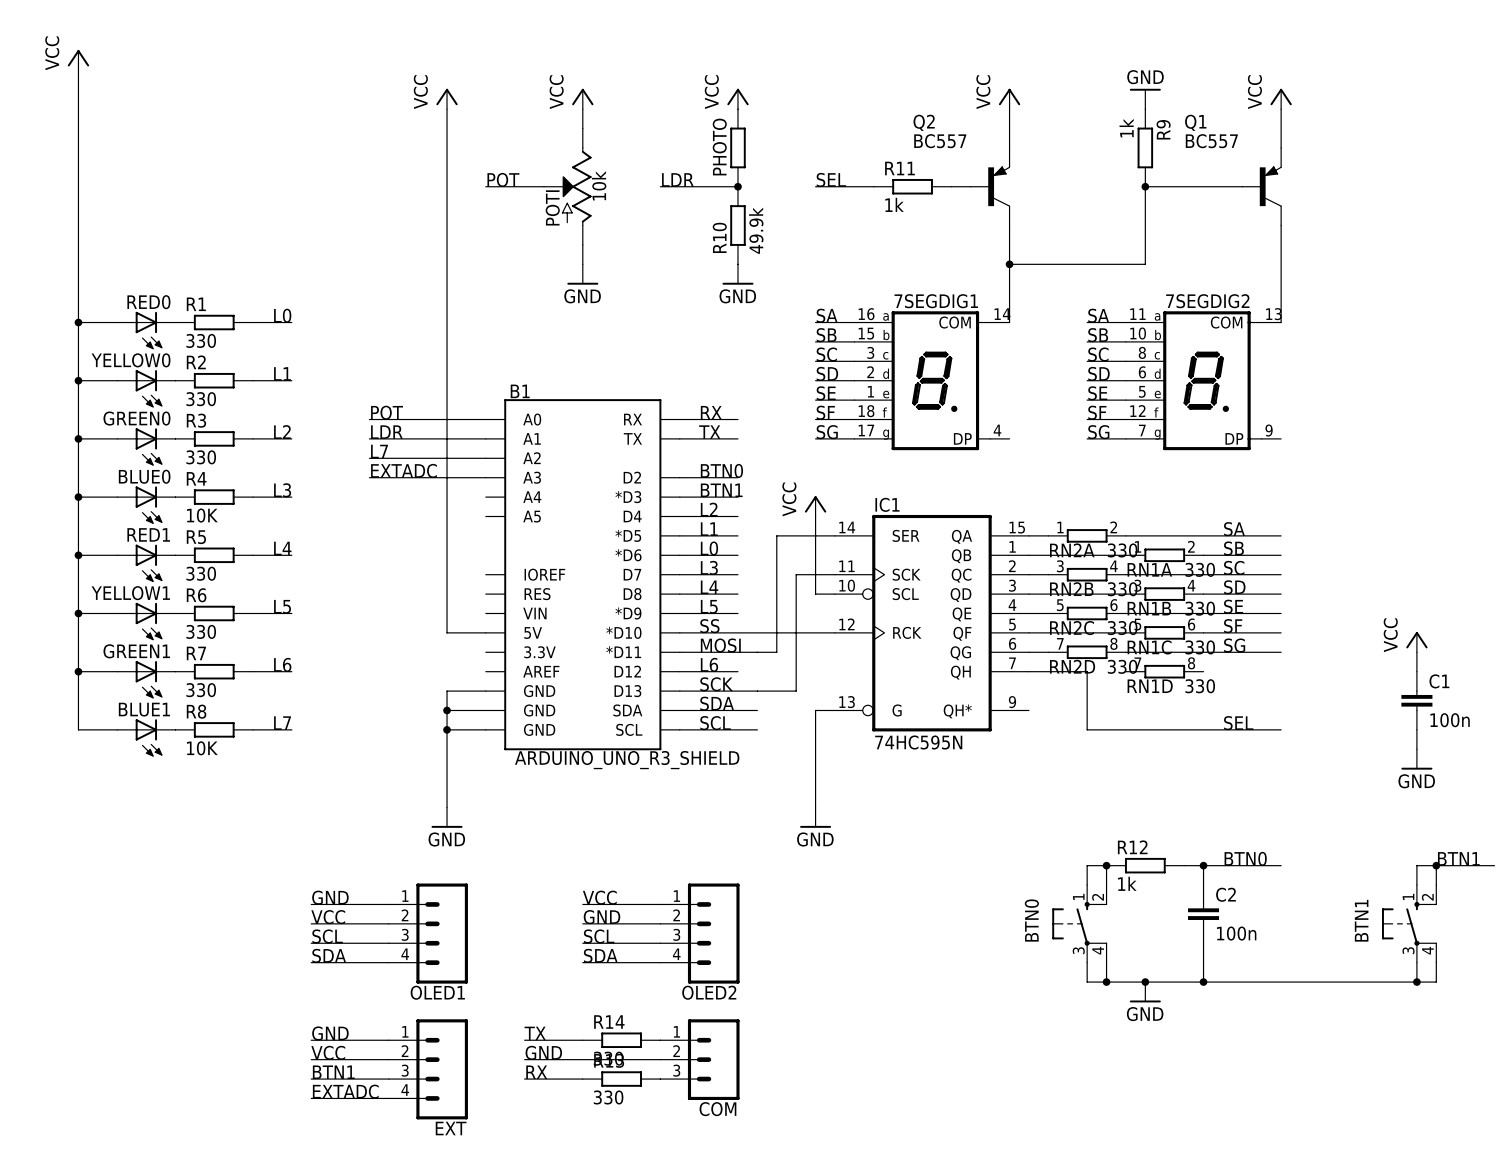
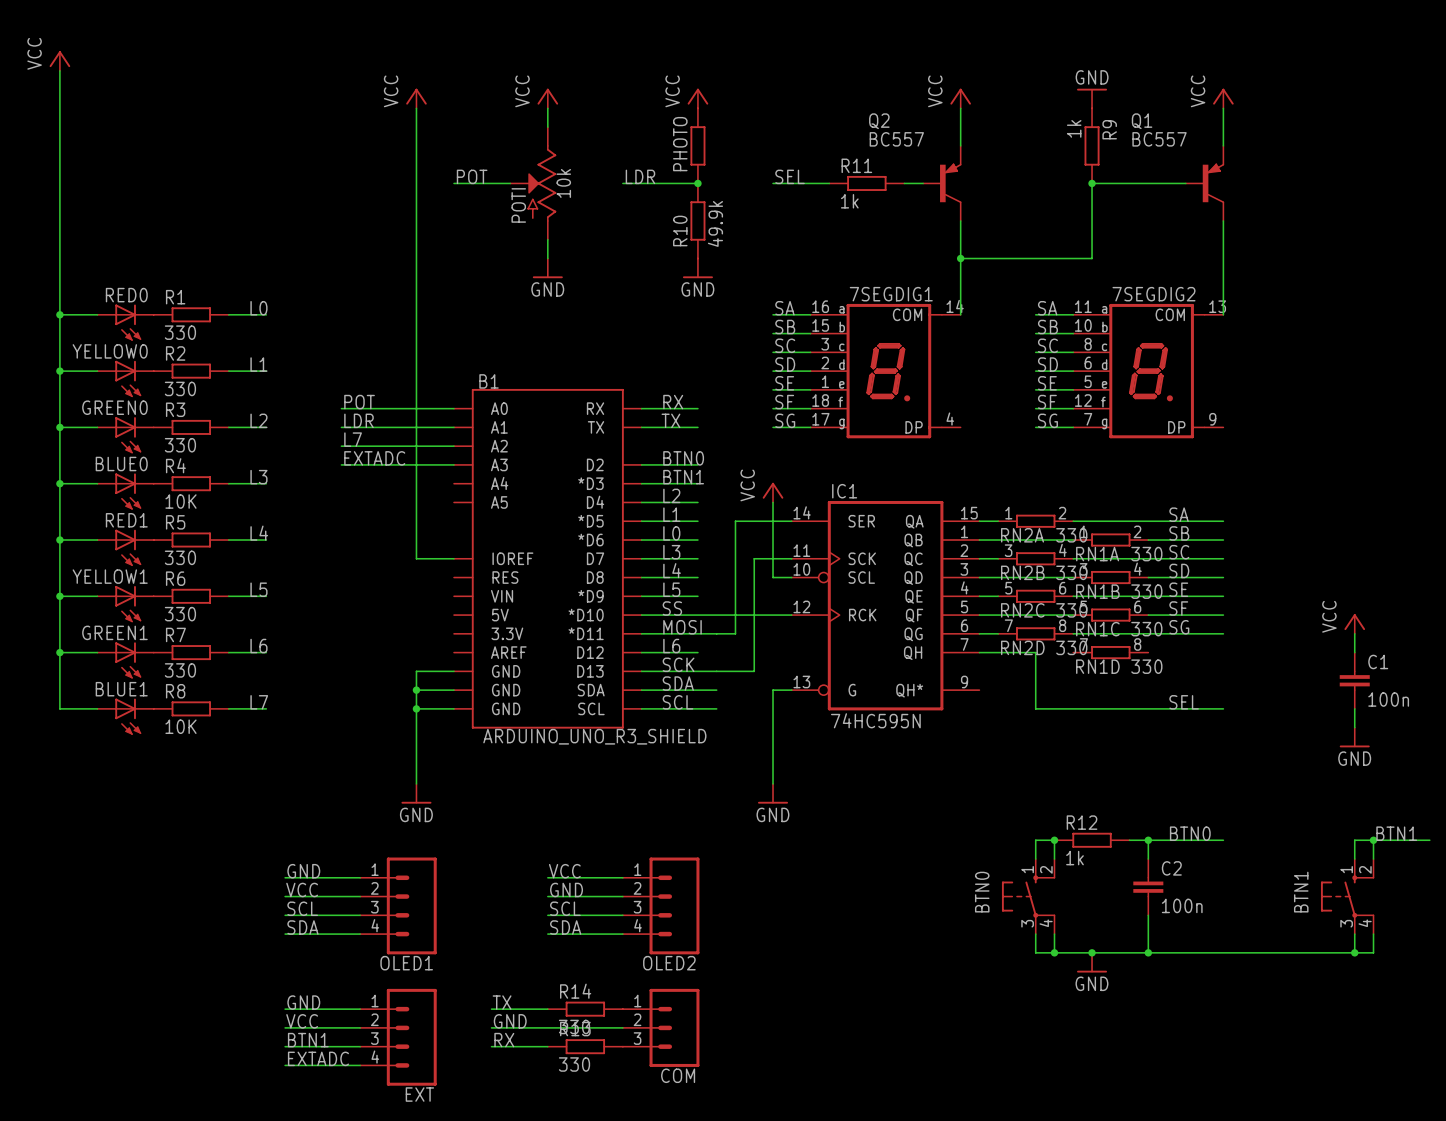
wire: (447, 574) (447, 632) (485, 632) -> (416, 558) (453, 558)

